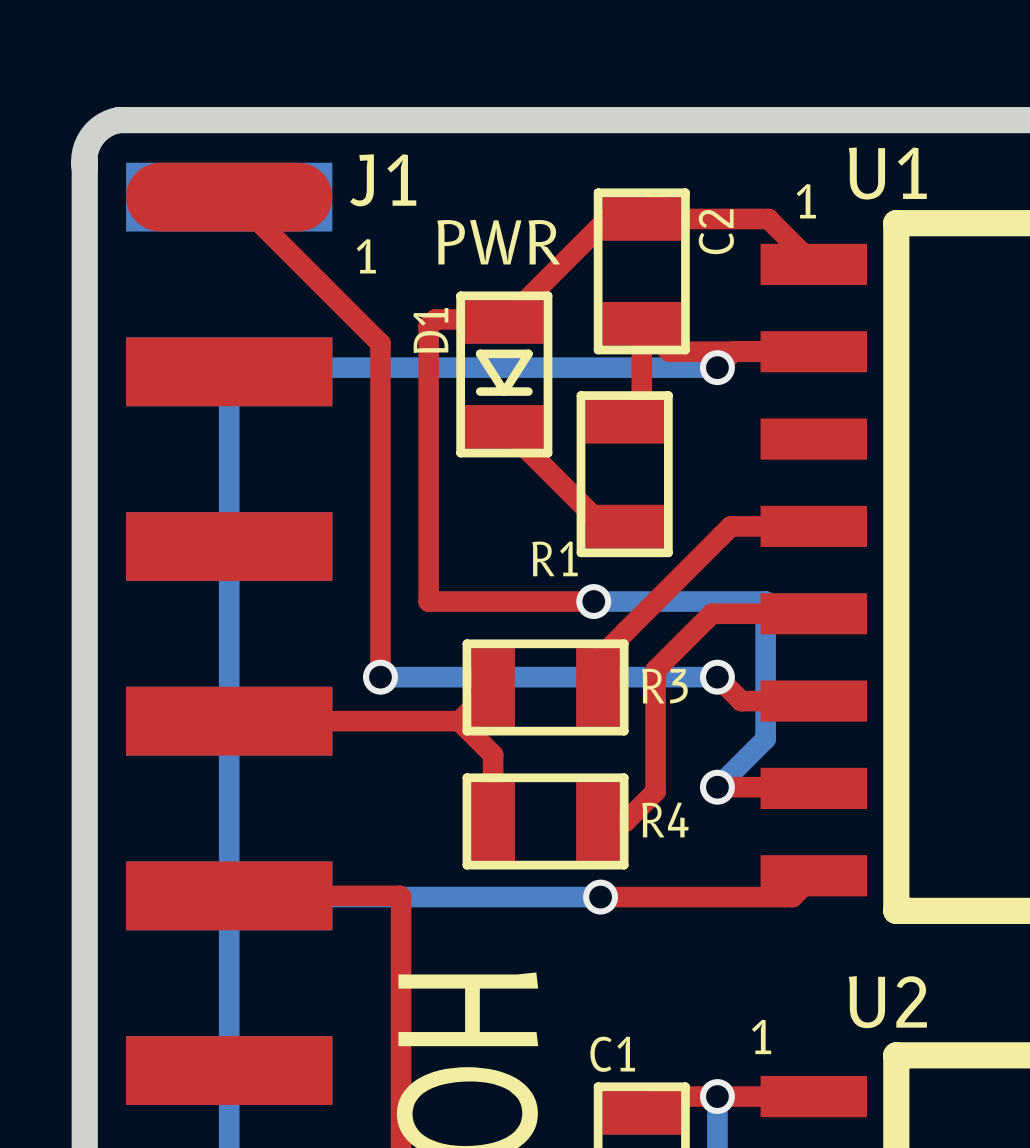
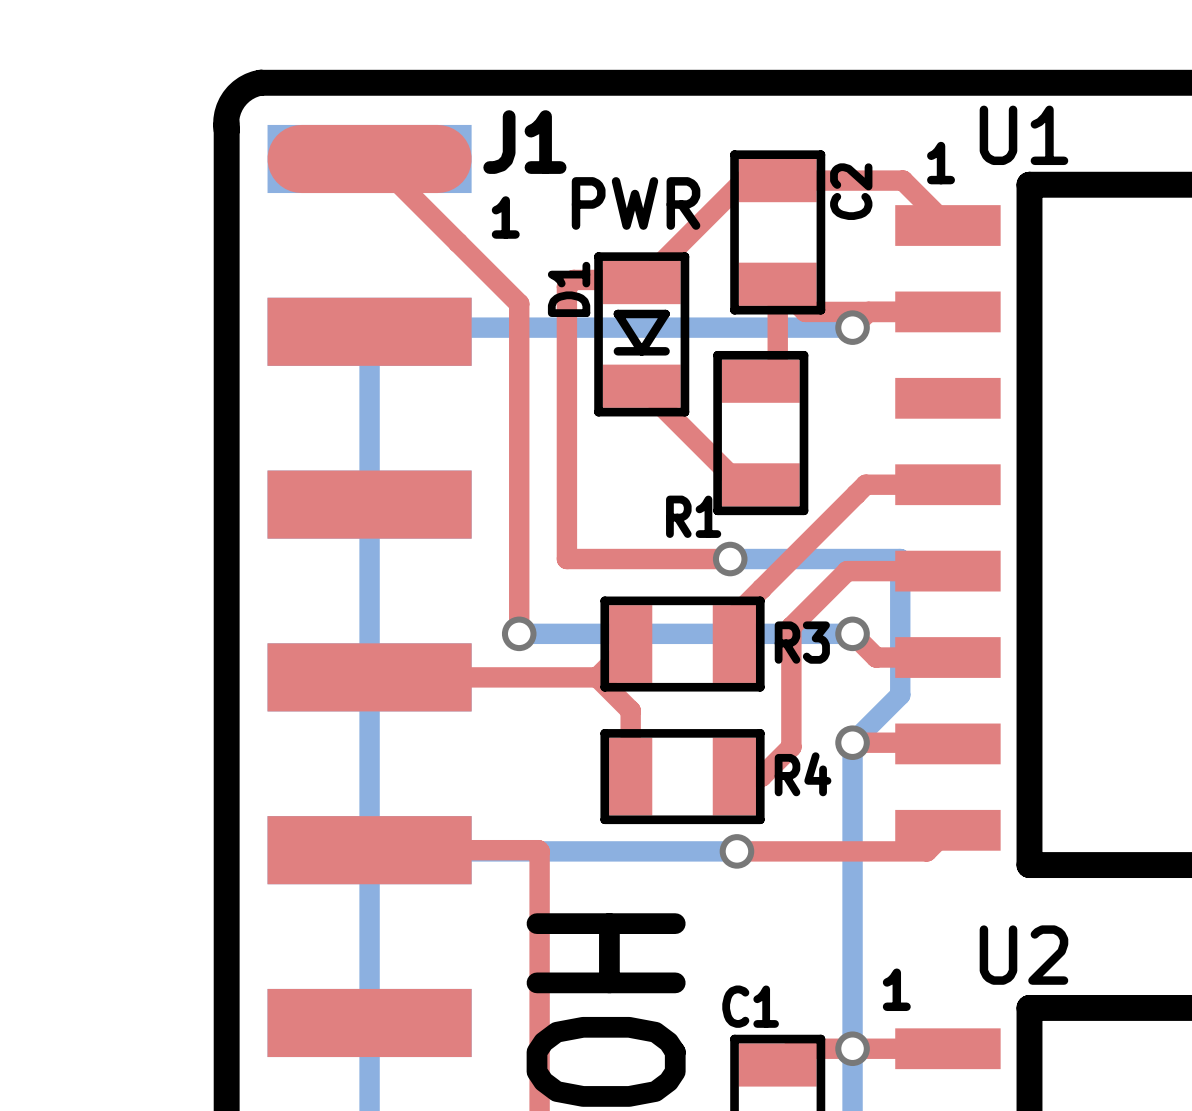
bottom track: none -> (852, 742) (852, 1048)

